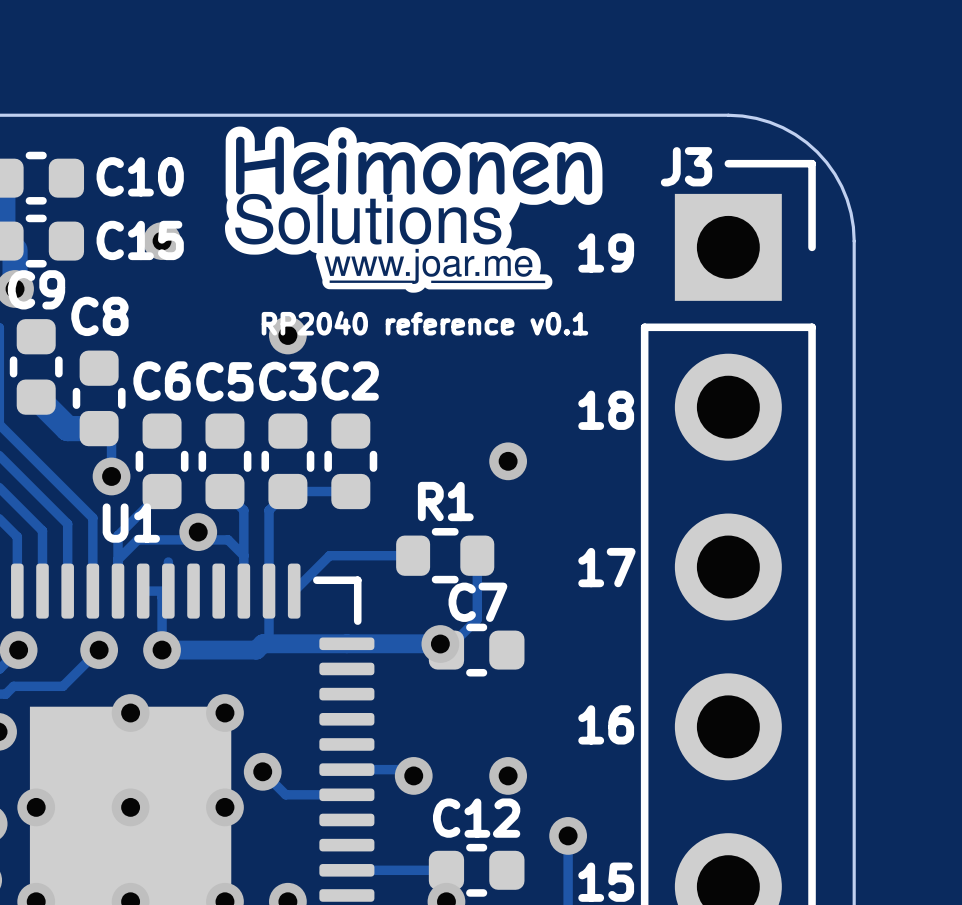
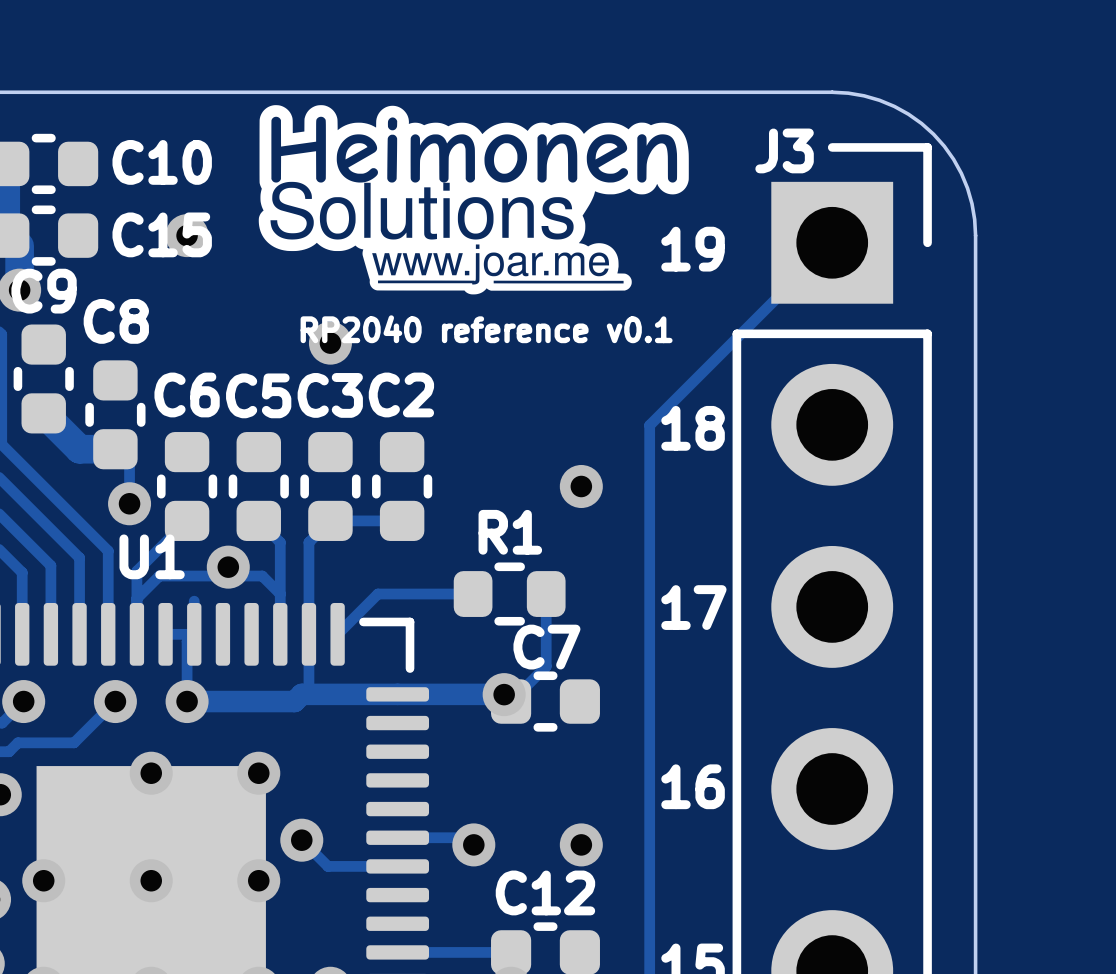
track: none -> (832, 242) (649, 425) (649, 913)
via: (568, 835) -> none

